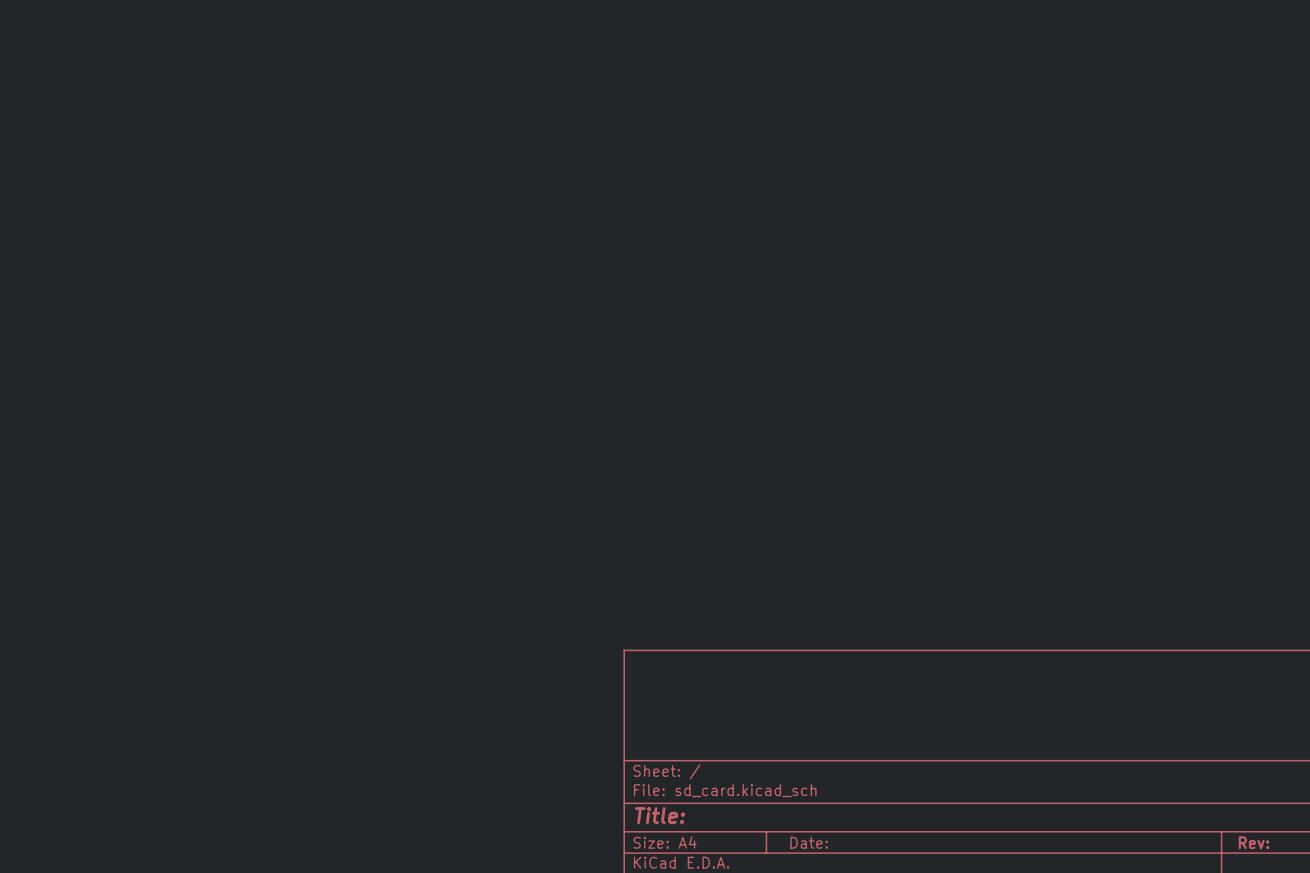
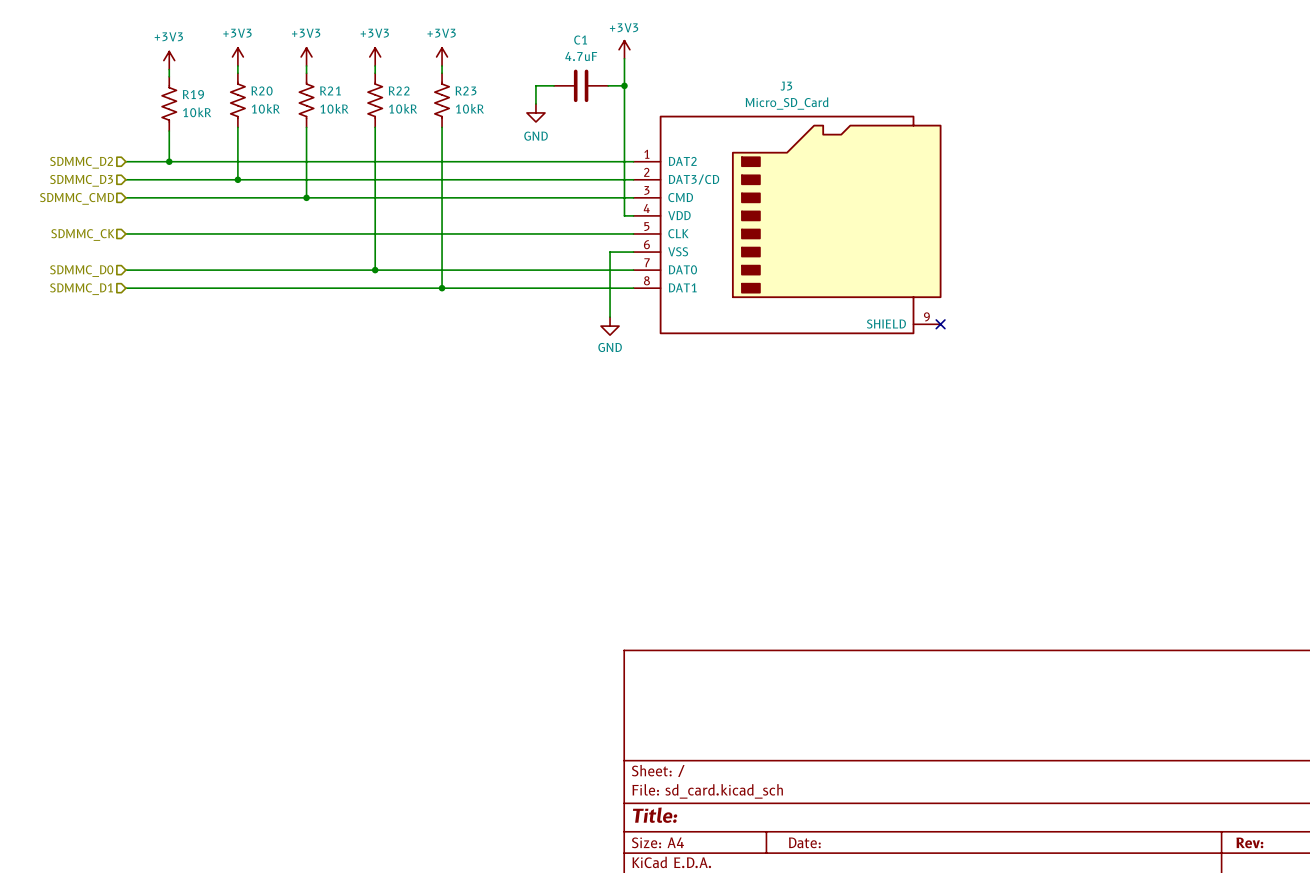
power symbol: none -> +3V3 (624, 49)
power symbol: none -> +3V3 (237, 56)
power symbol: none -> +3V3 (306, 56)
power symbol: none -> +3V3 (375, 56)
power symbol: none -> +3V3 (442, 56)
wire: none -> (624, 58) (624, 215) (633, 215)
power symbol: none -> +3V3 (169, 60)
wire: none -> (237, 65) (237, 73)
wire: none -> (306, 65) (306, 73)
wire: none -> (375, 65) (375, 73)
wire: none -> (442, 65) (442, 73)
wire: none -> (169, 69) (169, 76)
wire: none -> (554, 85) (535, 85) (535, 103)
C1: none -> 4.7uF (581, 85)
wire: none -> (608, 85) (624, 85)
junction: none -> (624, 85)
R20: none -> 10kR (237, 100)
R21: none -> 10kR (306, 100)
R22: none -> 10kR (375, 100)
R23: none -> 10kR (442, 100)
R19: none -> 10kR (169, 103)
power symbol: none -> GND (535, 112)
wire: none -> (237, 127) (237, 179)
wire: none -> (306, 127) (306, 197)
wire: none -> (375, 127) (375, 270)
wire: none -> (442, 127) (442, 288)
wire: none -> (169, 131) (169, 161)
hierarchical label: none -> SDMMC_D2 (81, 162)
wire: none -> (125, 161) (633, 161)
junction: none -> (169, 161)
hierarchical label: none -> SDMMC_D3 (81, 180)
wire: none -> (125, 179) (633, 179)
junction: none -> (237, 179)
hierarchical label: none -> SDMMC_CMD (77, 198)
wire: none -> (125, 197) (633, 197)
junction: none -> (306, 197)
J3: none -> Micro_SD_Card (787, 224)
wire: none -> (125, 233) (633, 233)
hierarchical label: none -> SDMMC_CK (82, 234)
wire: none -> (633, 252) (610, 252) (610, 317)
hierarchical label: none -> SDMMC_D0 (81, 271)
wire: none -> (125, 270) (633, 270)
junction: none -> (375, 270)
hierarchical label: none -> SDMMC_D1 (81, 289)
wire: none -> (125, 288) (633, 288)
junction: none -> (442, 288)
no-connect mark: none -> (940, 324)
power symbol: none -> GND (610, 326)

